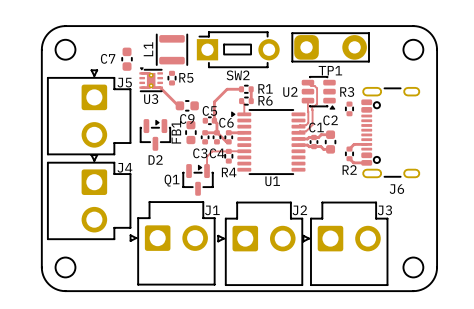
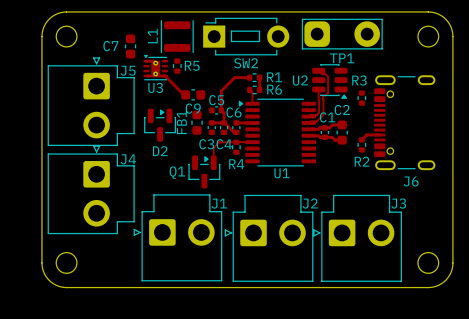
track: (349, 158) (353, 162) (366, 162) -> none

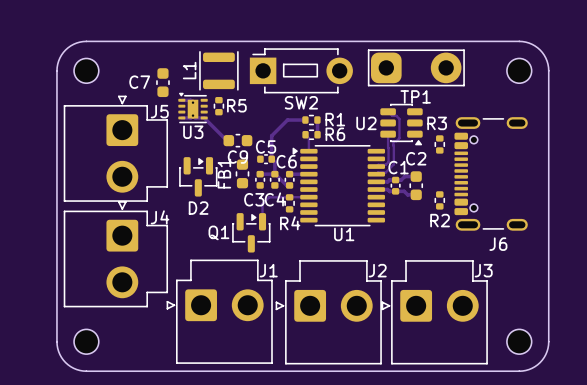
track: (379, 135) (366, 135) (361, 139) -> none

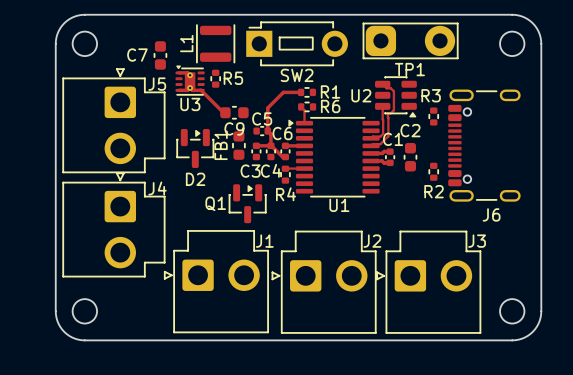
track: (317, 120) (317, 134) -> none
track: (416, 176) (404, 176) (401, 180) (395, 180) -> none
track: (395, 191) (416, 194) -> none
track: (289, 197) (269, 197) (262, 203) (262, 221) -> none

